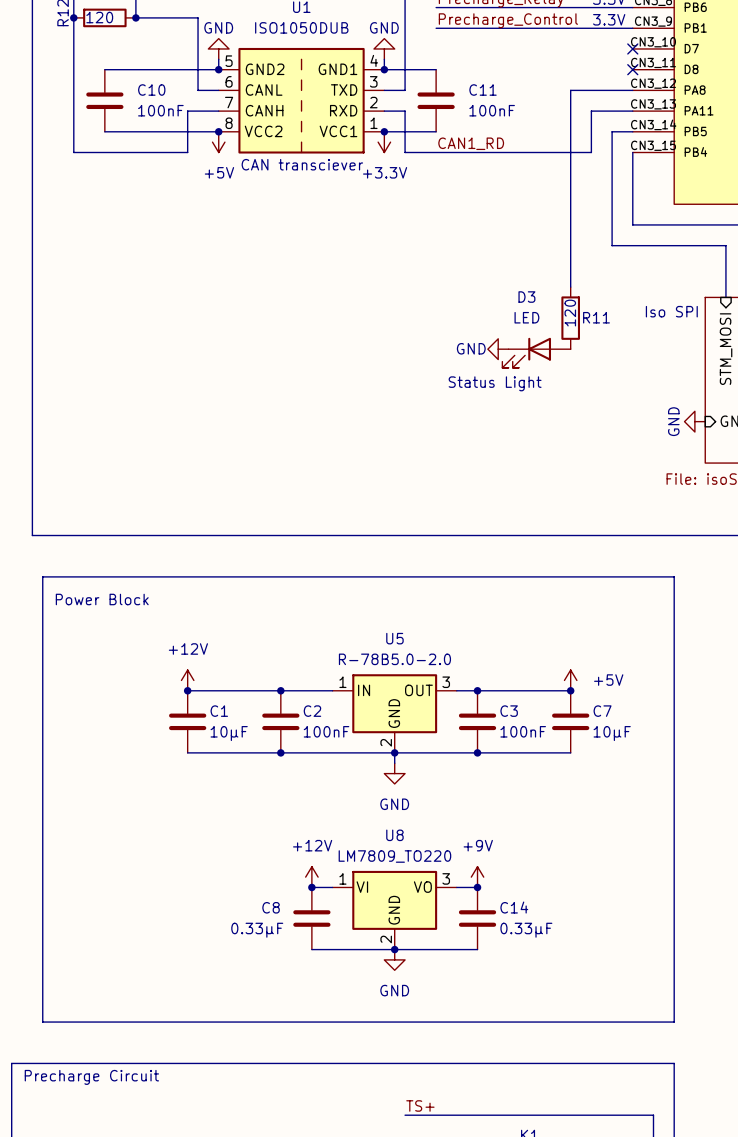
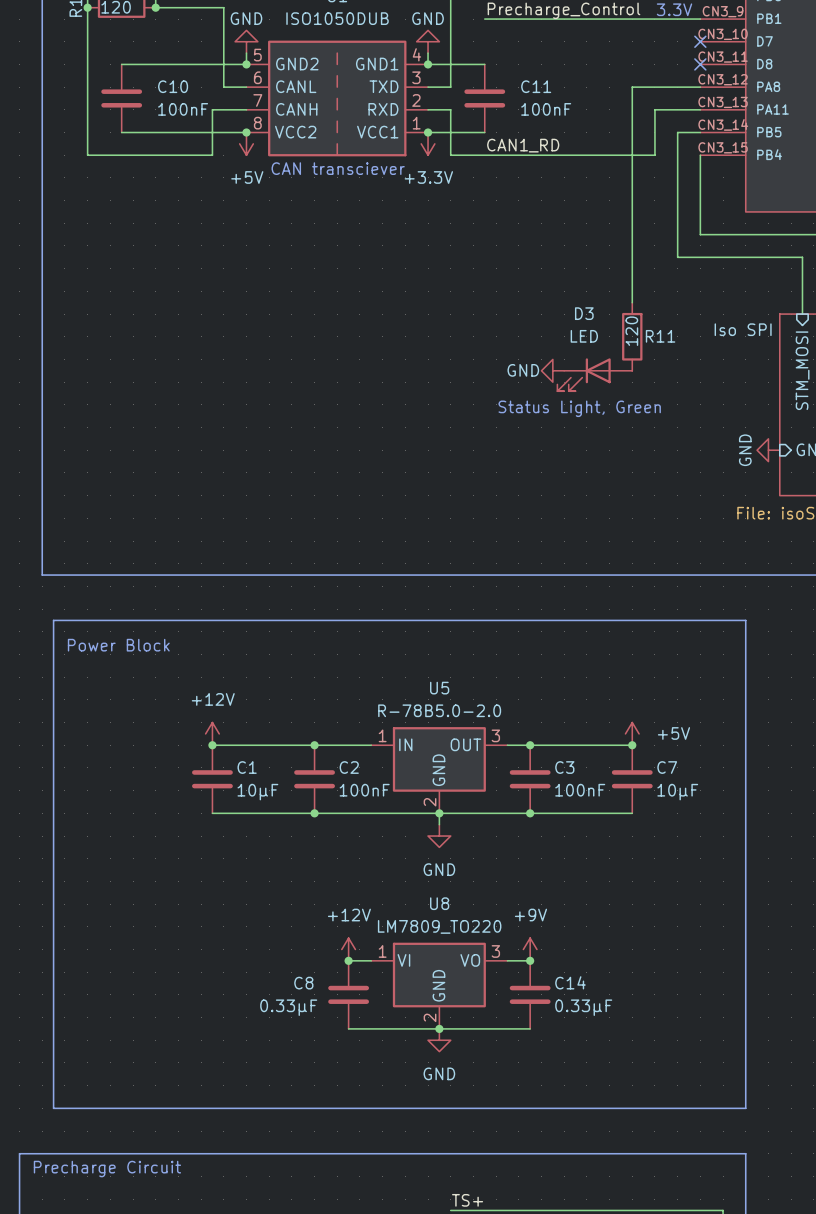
text: Status Light (495, 383) -> Status Light, Green (579, 408)

